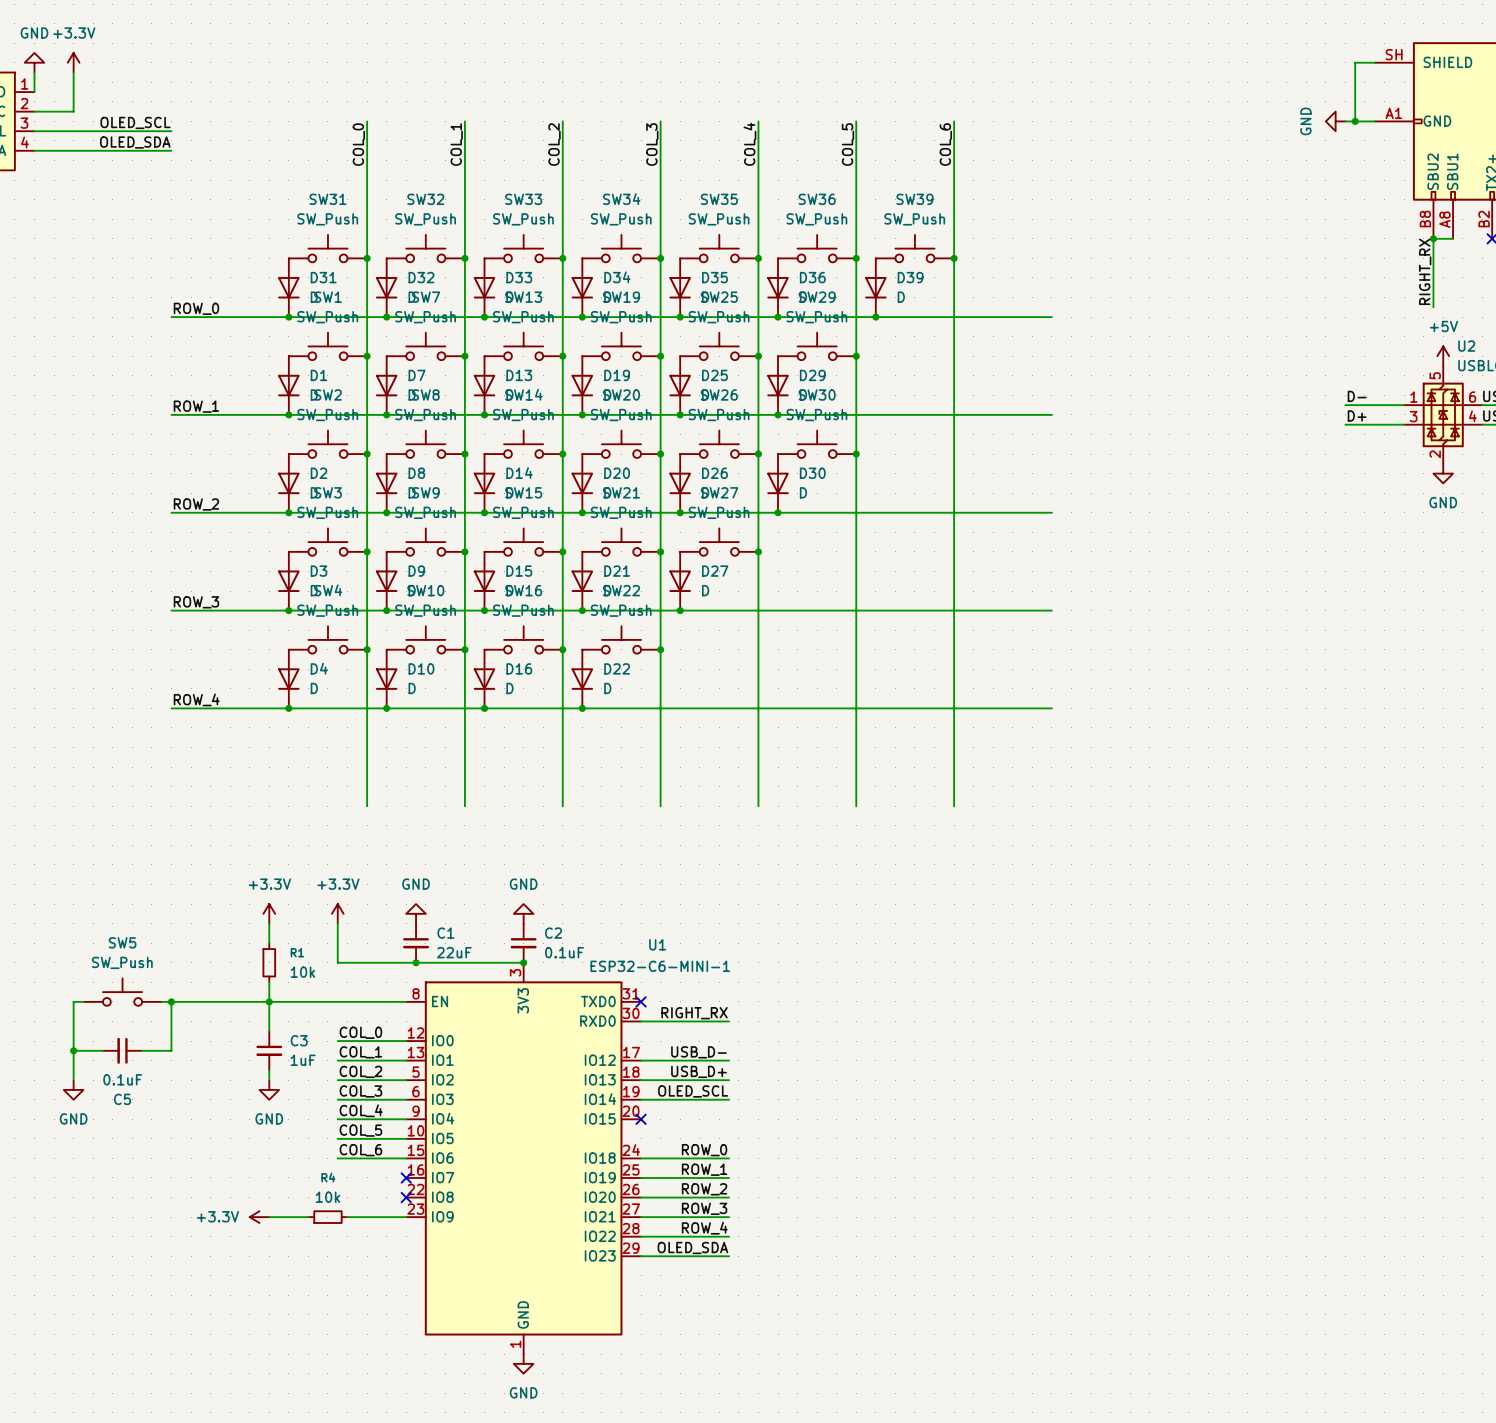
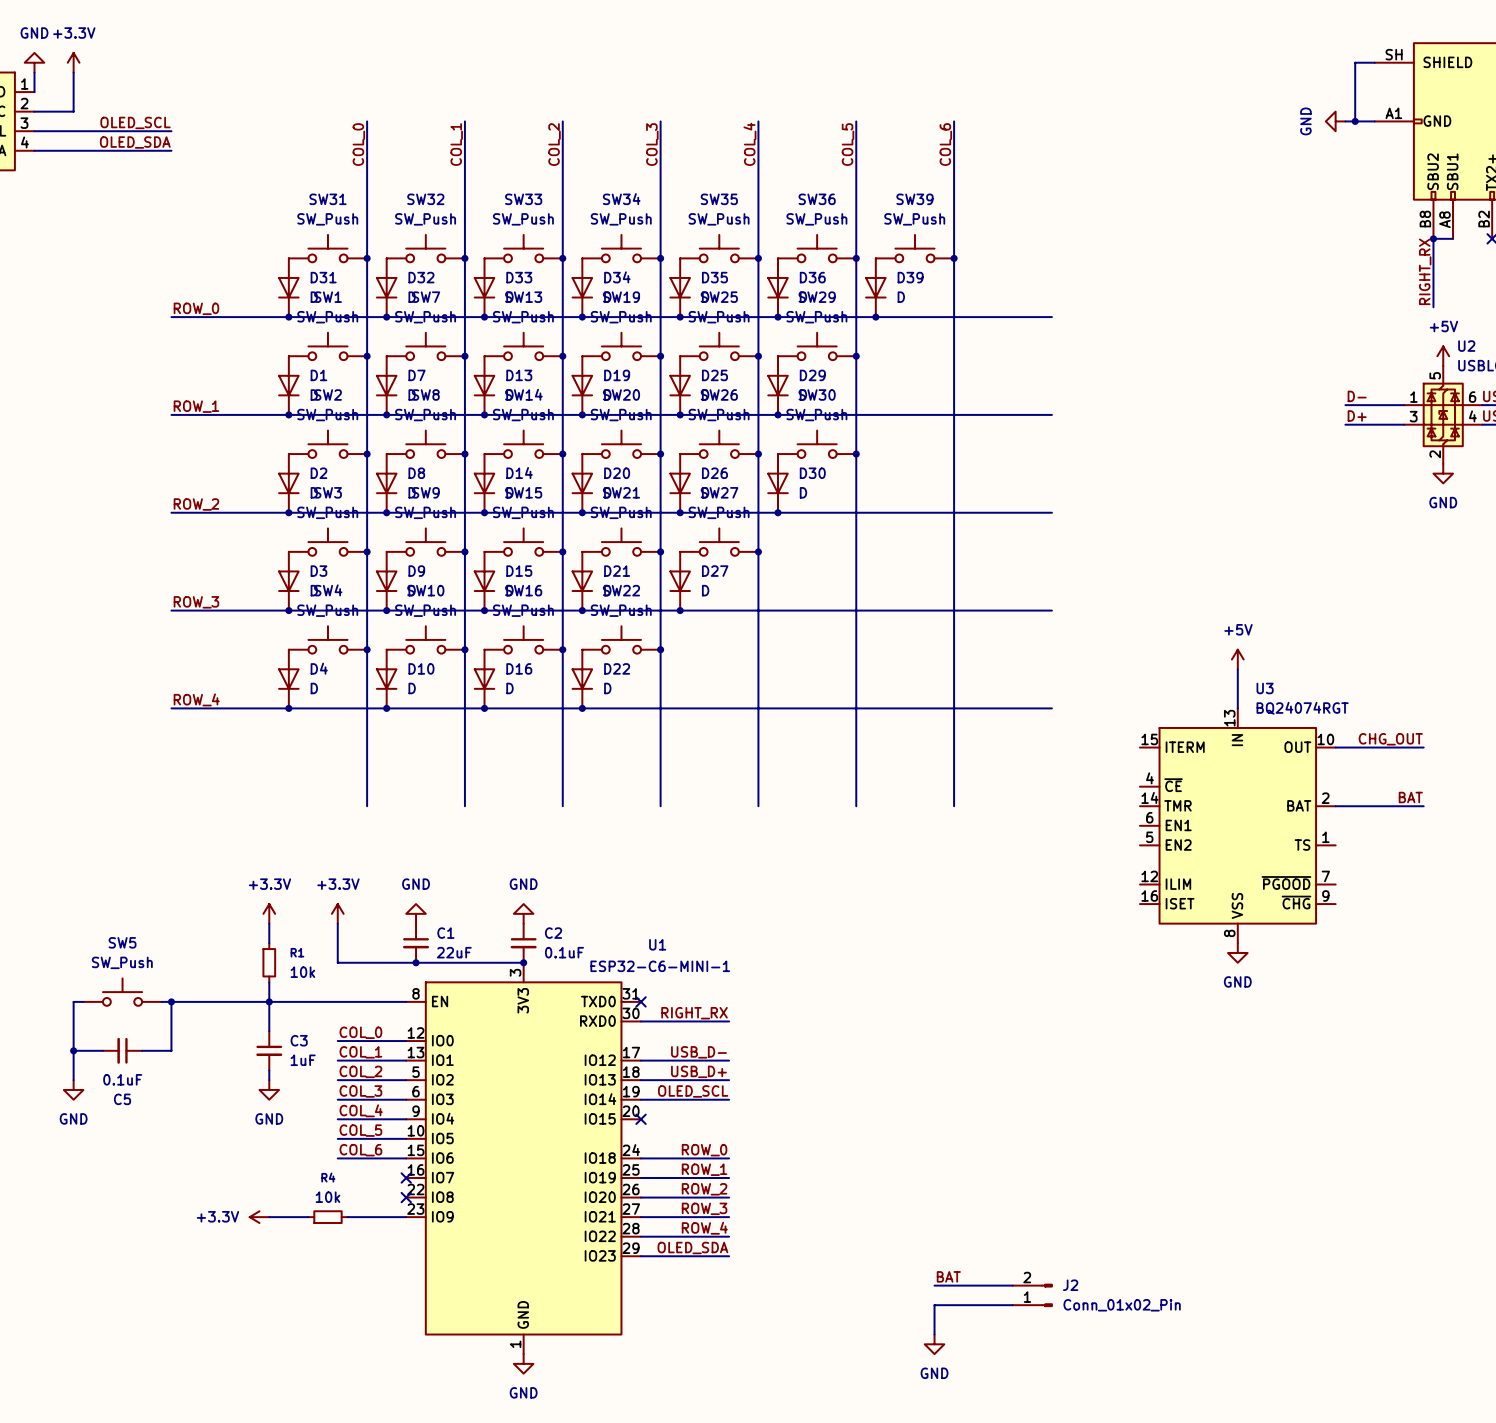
power symbol: none -> +5V (1237, 659)
wire: none -> (1237, 669) (1237, 708)
label: none -> CHG_OUT (1390, 739)
wire: none -> (1335, 747) (1423, 747)
label: none -> BAT (1410, 797)
wire: none -> (1335, 806) (1423, 806)
U3: none -> BQ24074RGT (1237, 825)
power symbol: none -> GND (1237, 952)
label: none -> BAT (948, 1276)
wire: none -> (934, 1285) (1012, 1285)
J2: none -> Conn_01x02_Pin (1032, 1295)
wire: none -> (1012, 1305) (934, 1305) (934, 1334)
power symbol: none -> GND (934, 1344)

